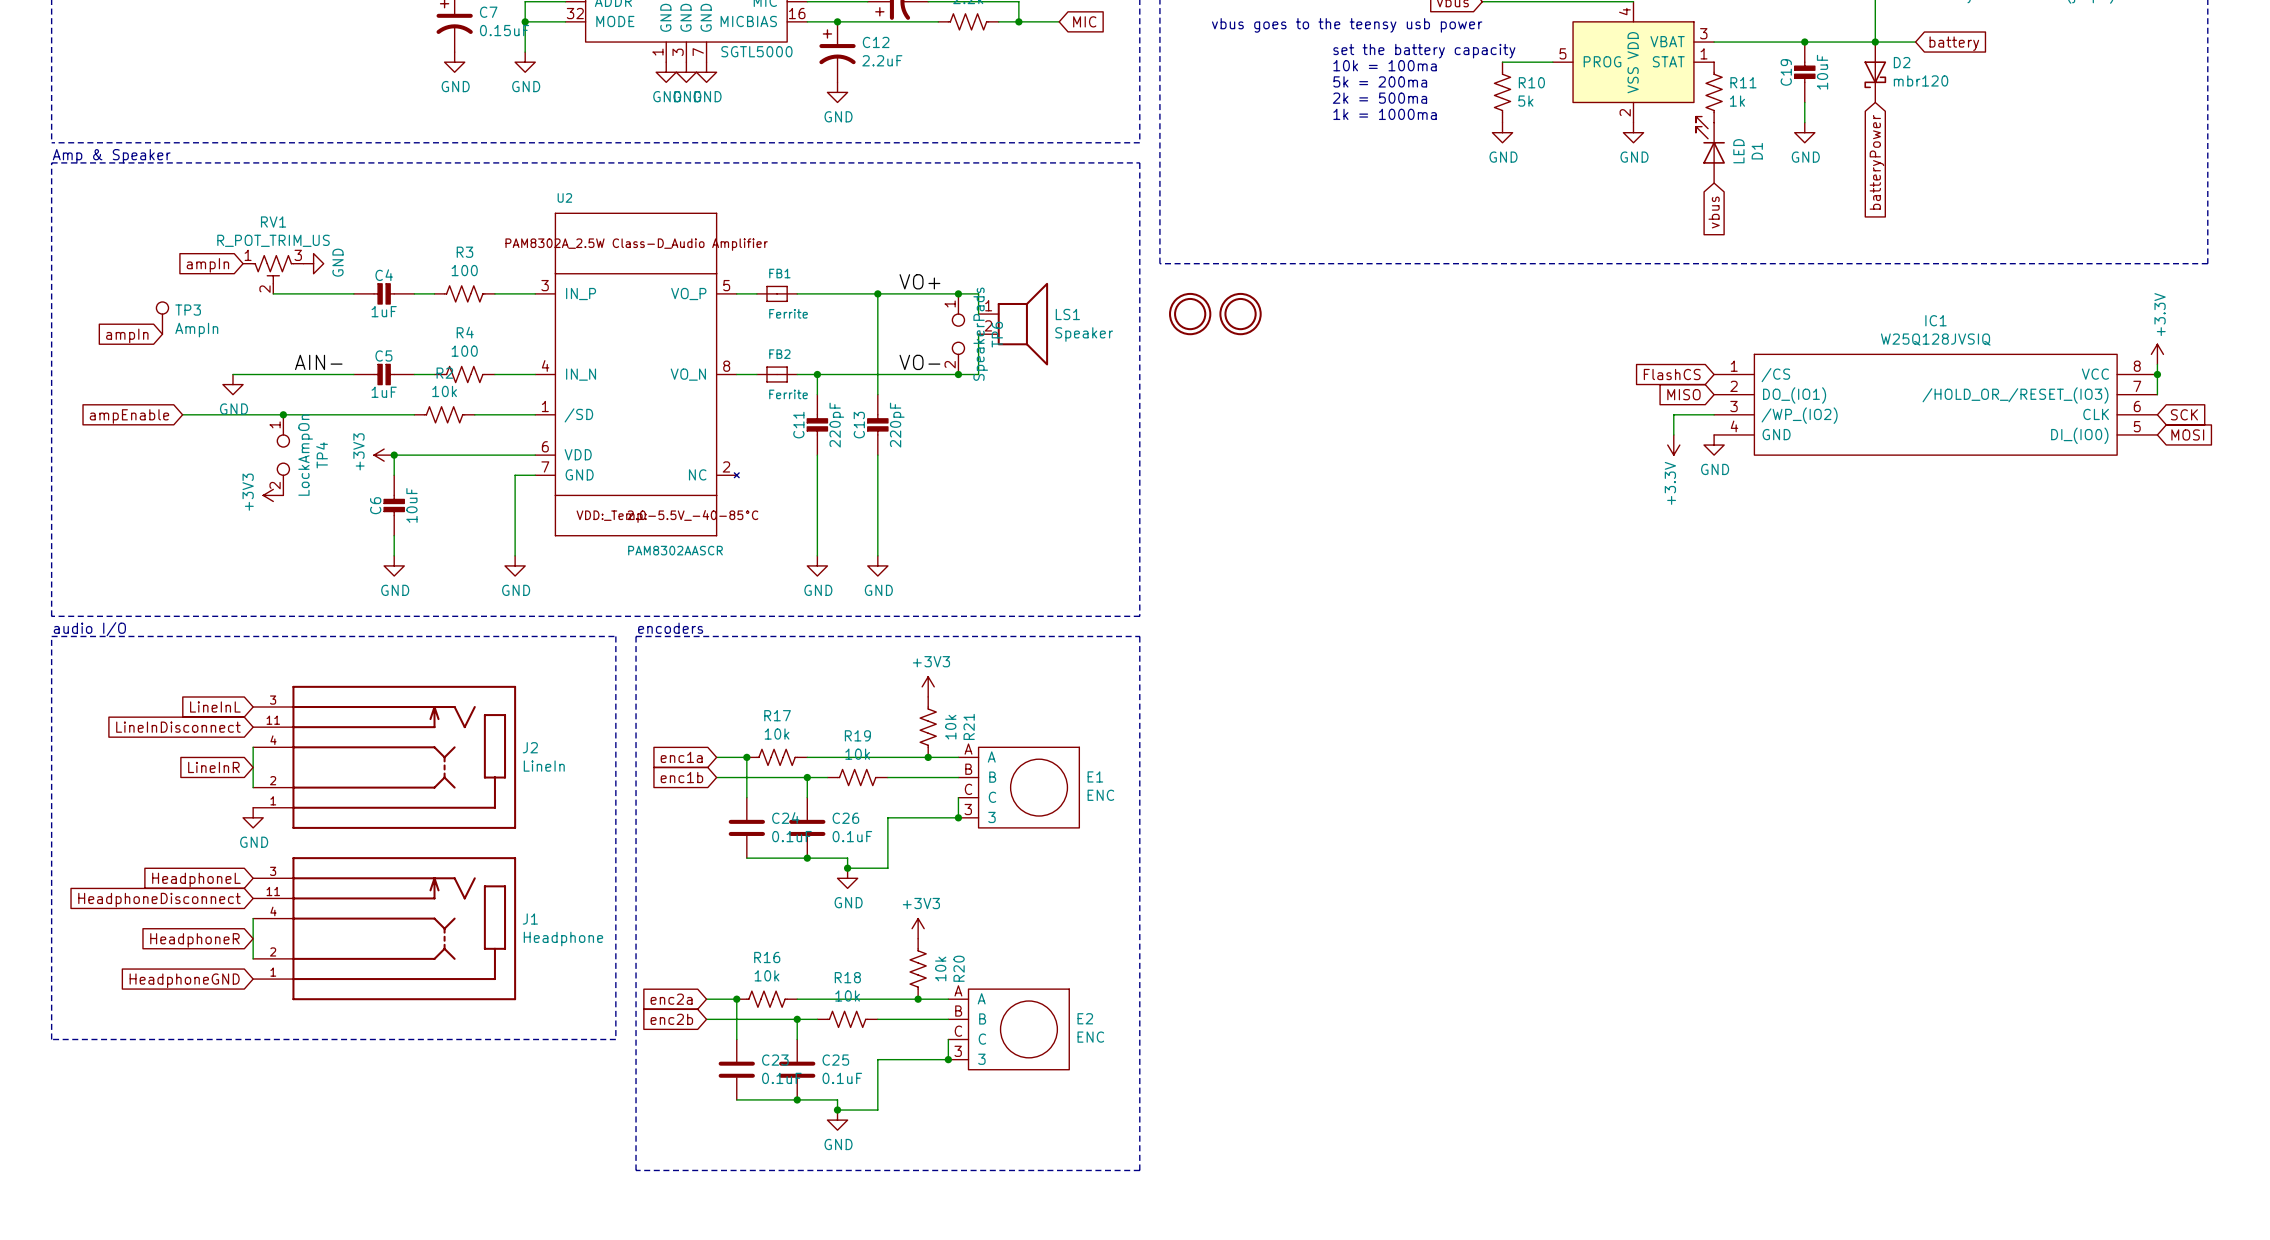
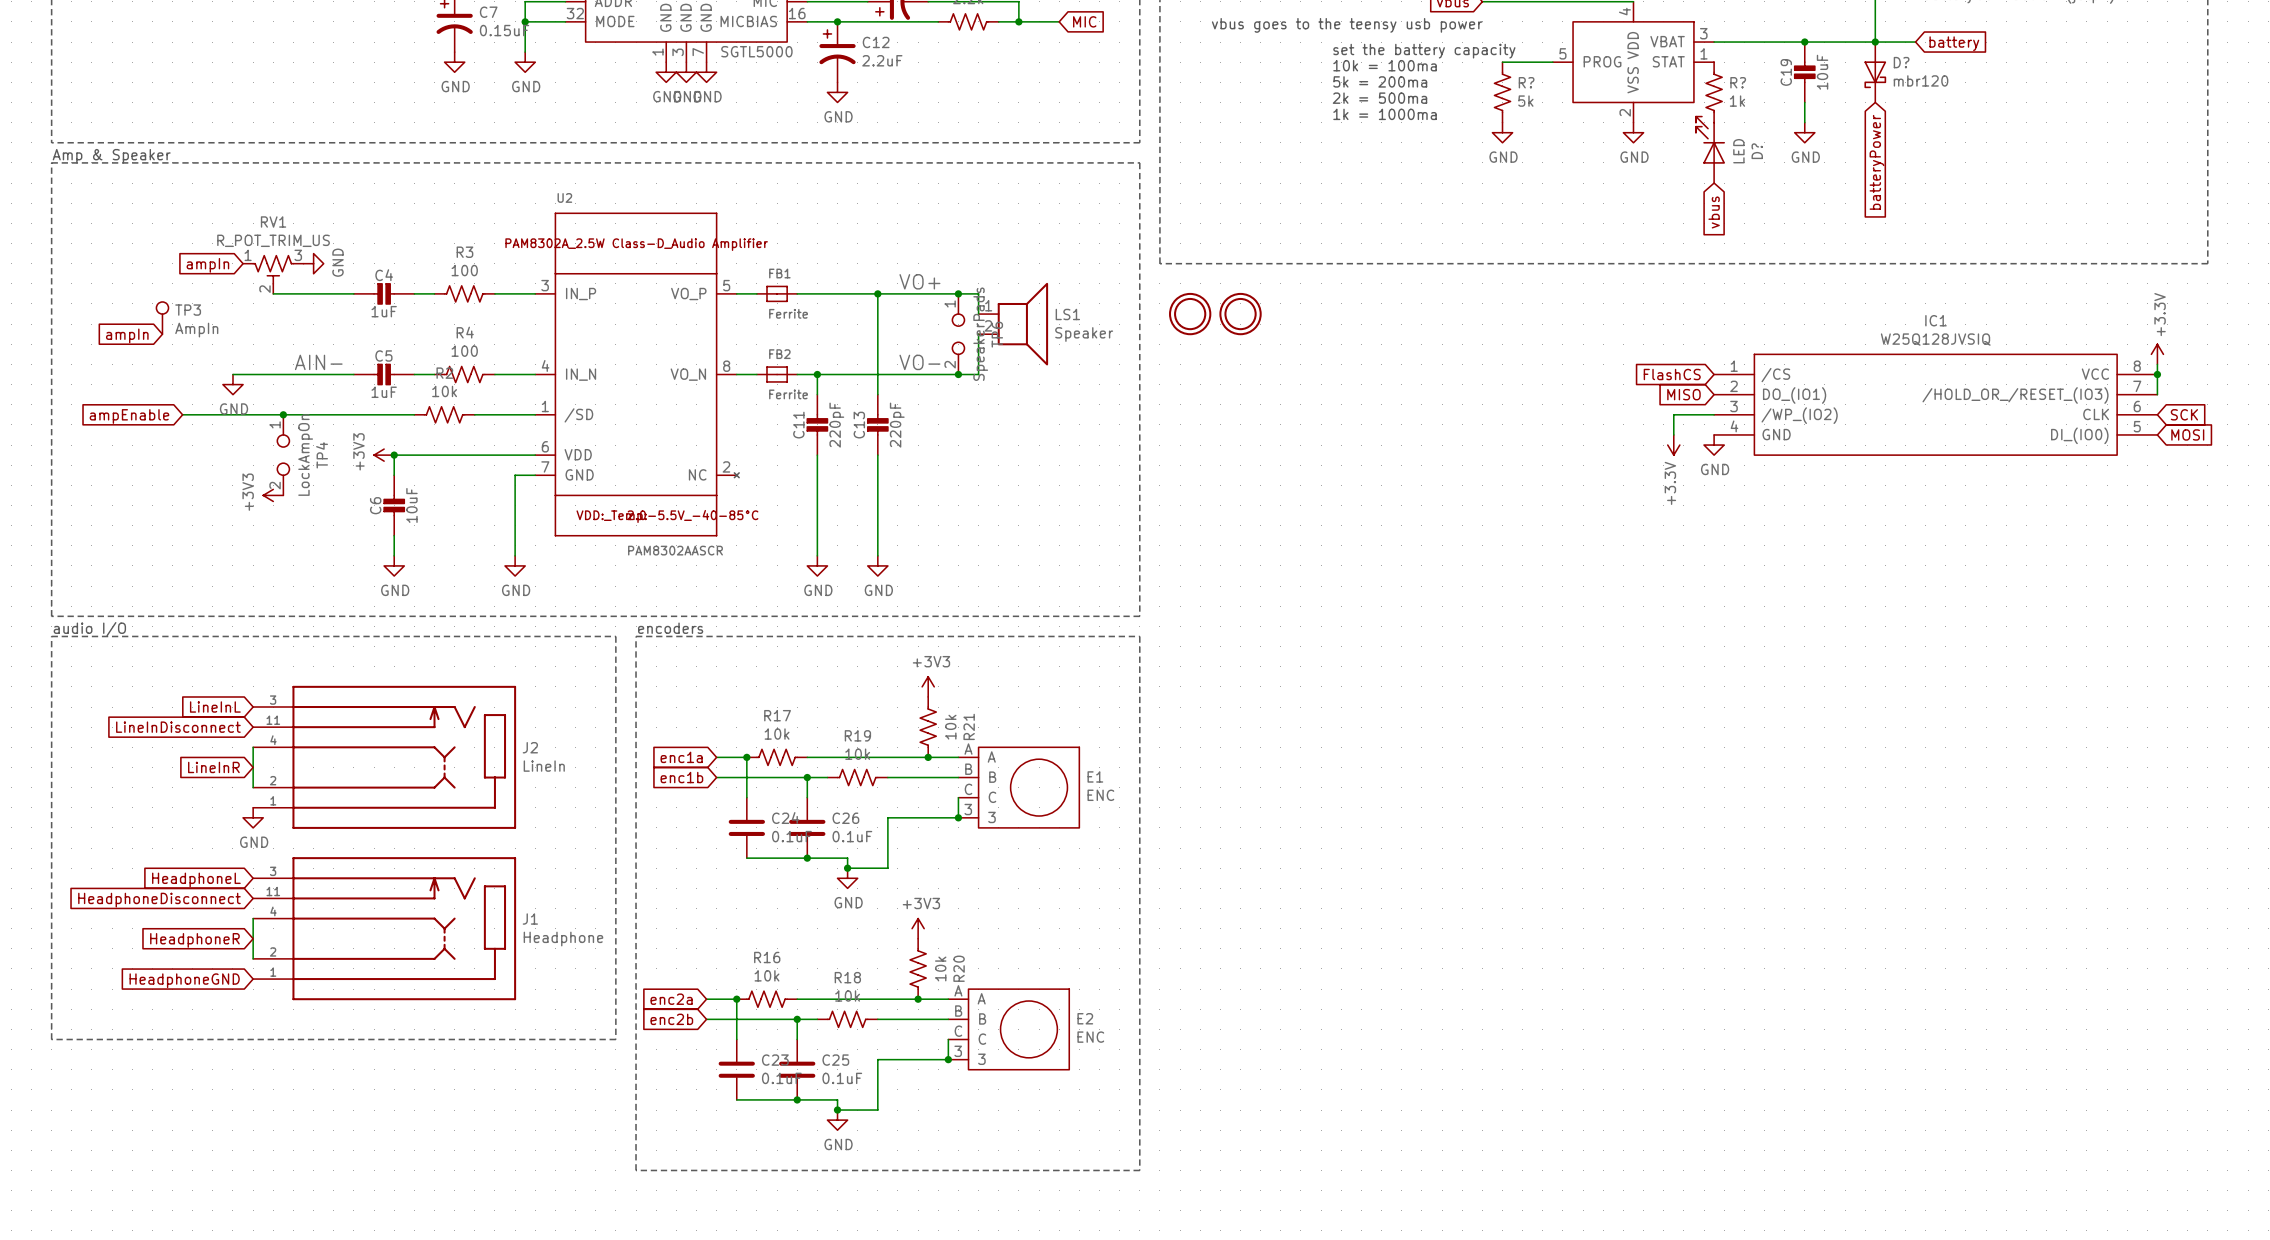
D2 name: D2 (1902, 62) -> D? (1901, 62)
R10 name: R10 (1531, 82) -> R? (1526, 82)
R11 name: R11 (1743, 82) -> R? (1738, 82)
D1 name: D1 (1757, 151) -> D? (1757, 151)

